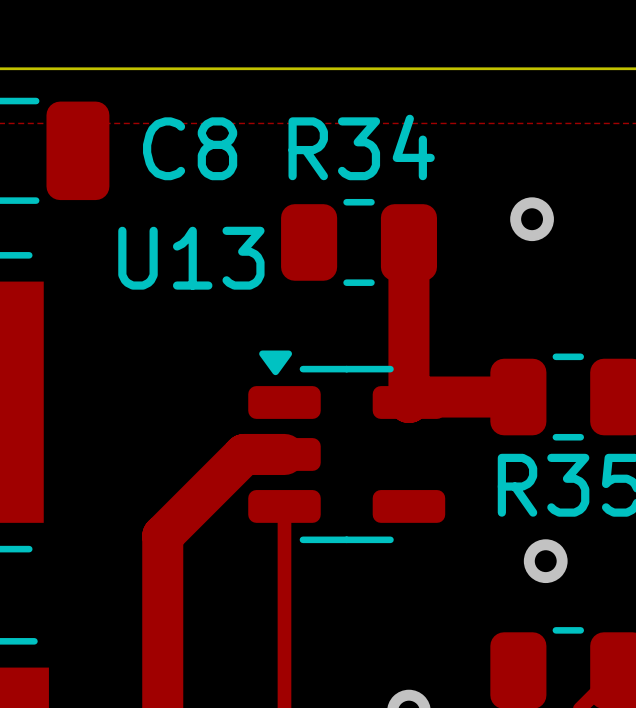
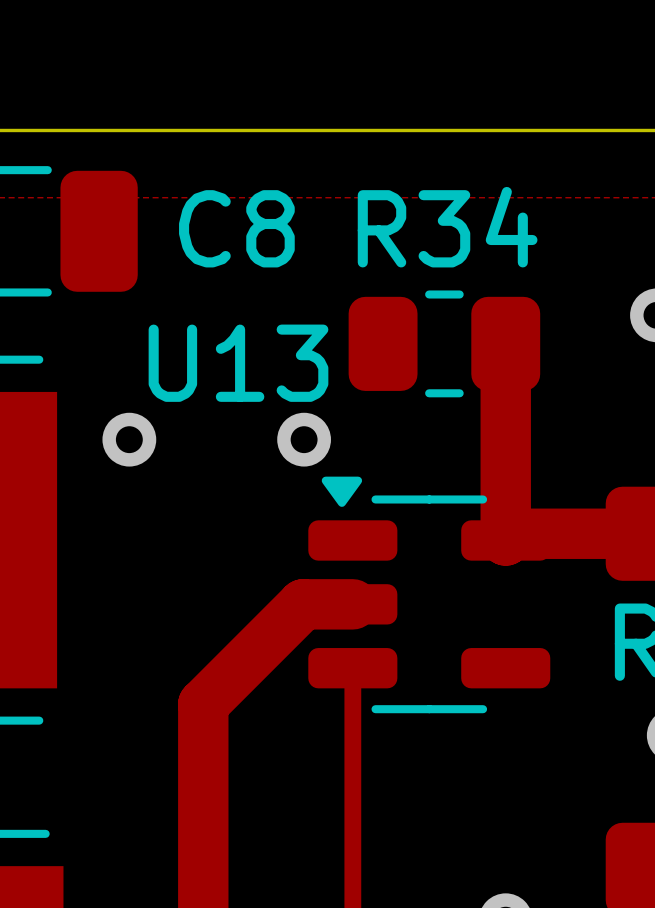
via: none -> (129, 439)
via: none -> (304, 439)

